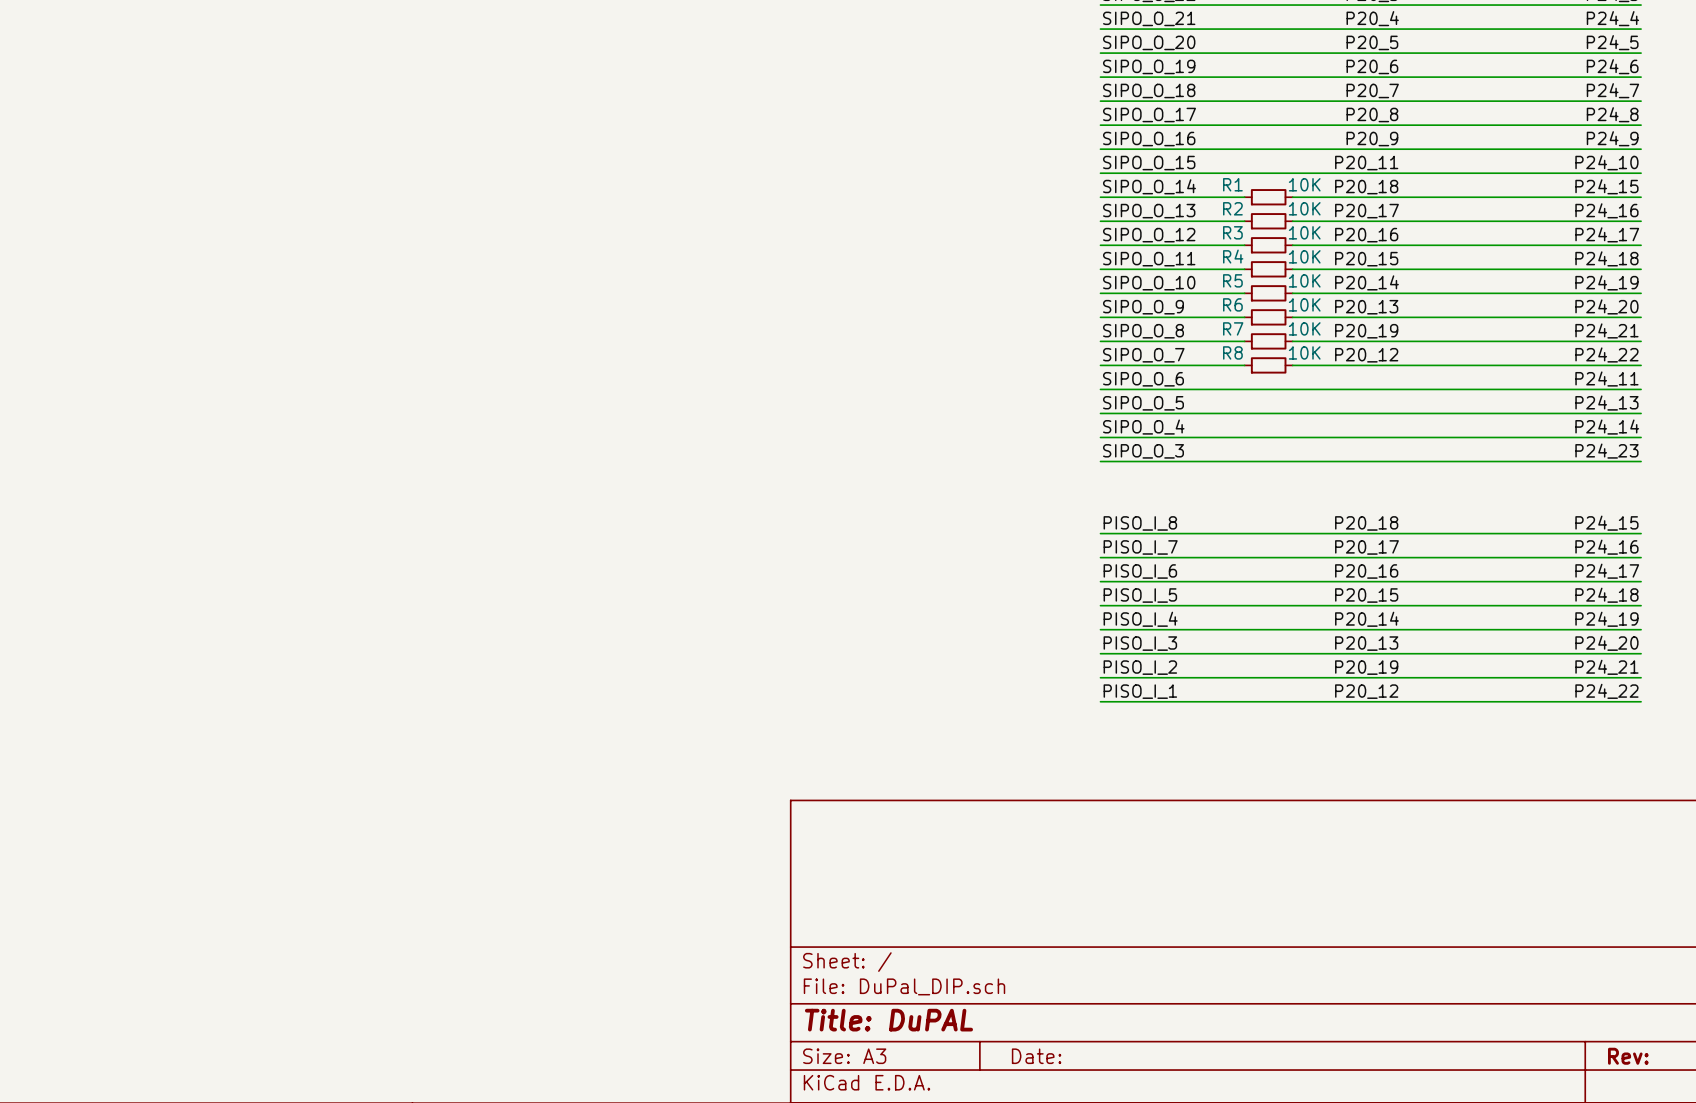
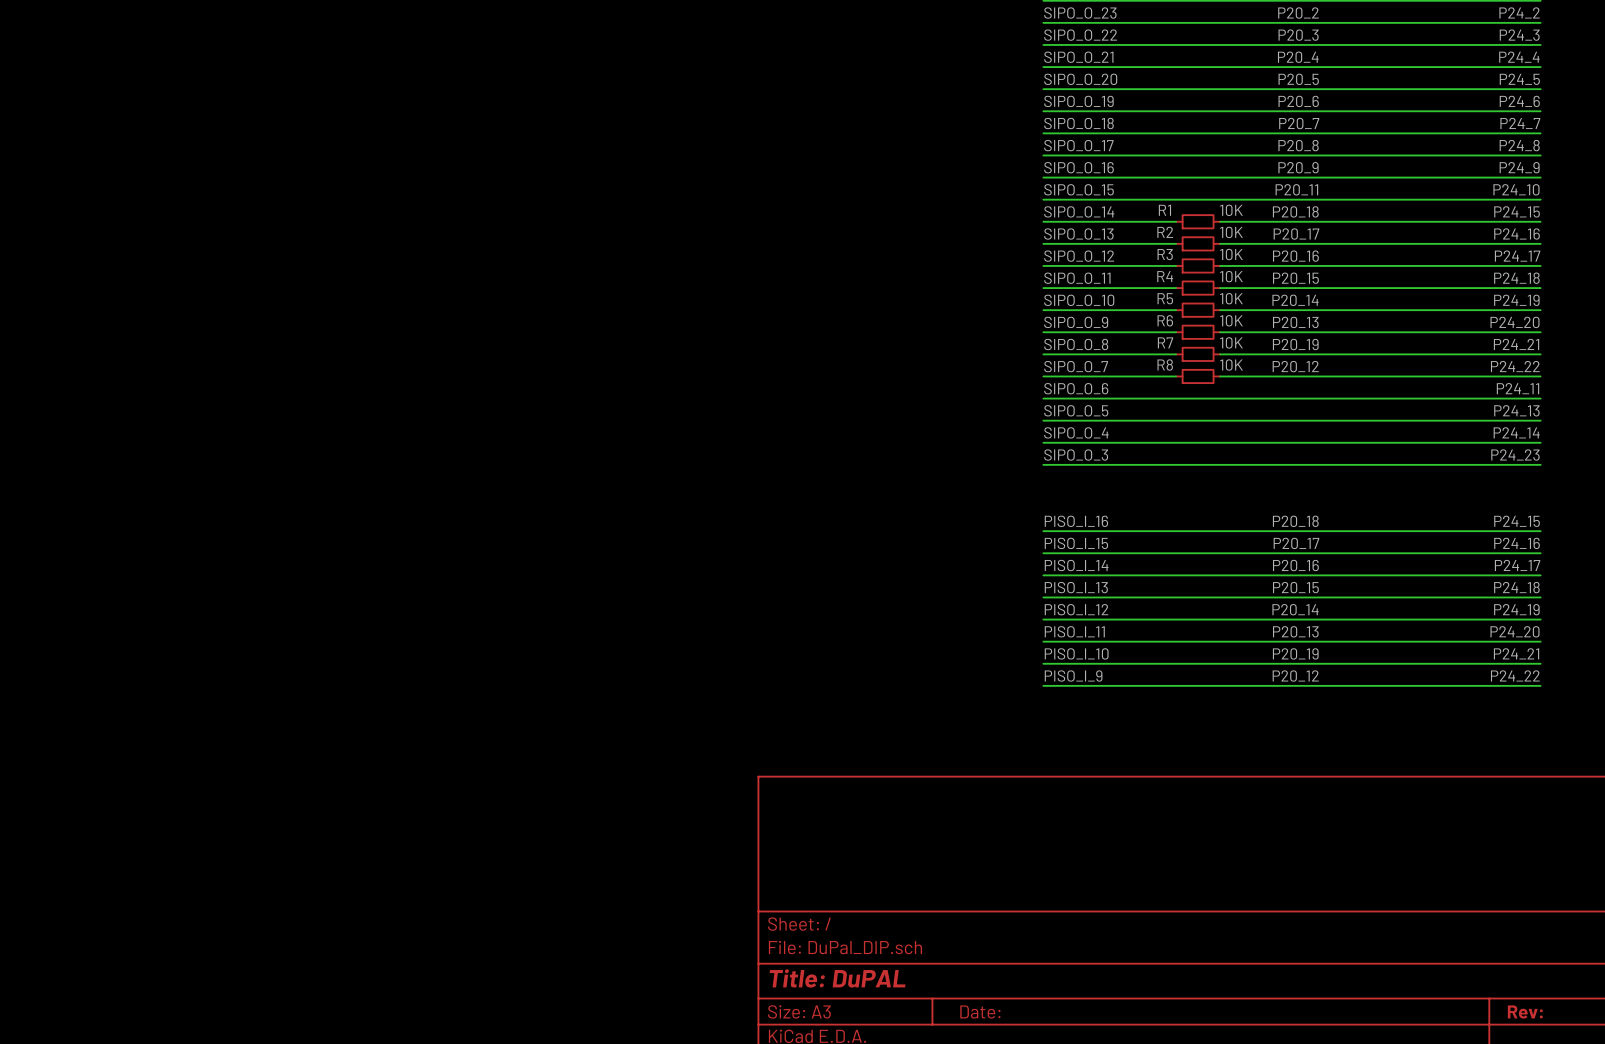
label: PISO_I_8 (1140, 523) -> PISO_I_16 (1076, 521)
label: PISO_I_7 (1140, 547) -> PISO_I_15 (1076, 543)
label: PISO_I_6 (1140, 571) -> PISO_I_14 (1076, 565)
label: PISO_I_5 (1140, 595) -> PISO_I_13 (1076, 587)
label: PISO_I_4 (1140, 619) -> PISO_I_12 (1076, 609)
label: PISO_I_3 (1140, 643) -> PISO_I_11 (1074, 631)
label: PISO_I_2 (1140, 667) -> PISO_I_10 (1076, 653)
label: PISO_I_1 (1140, 691) -> PISO_I_9 (1073, 676)

